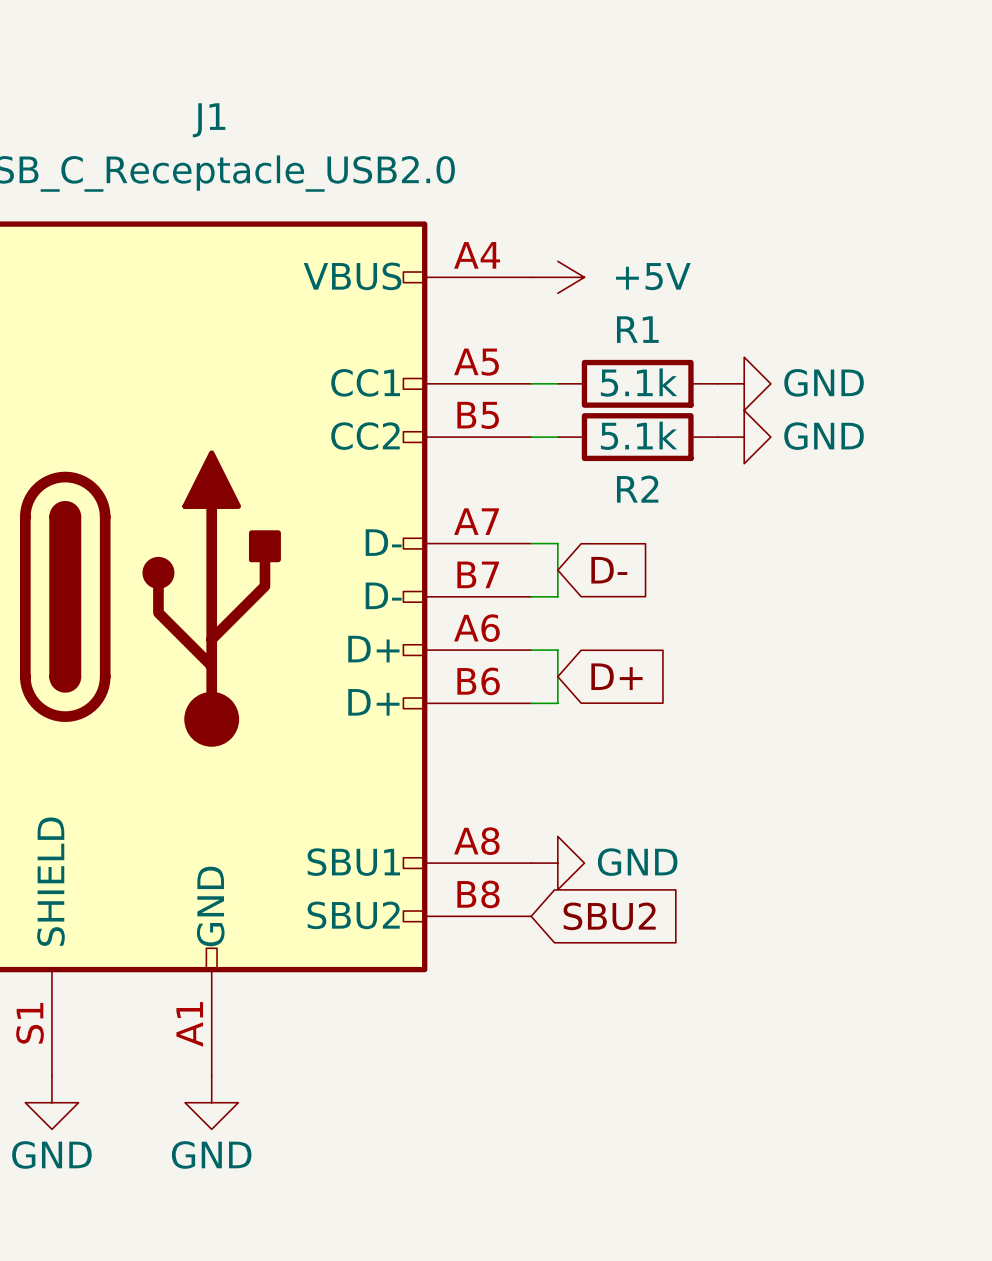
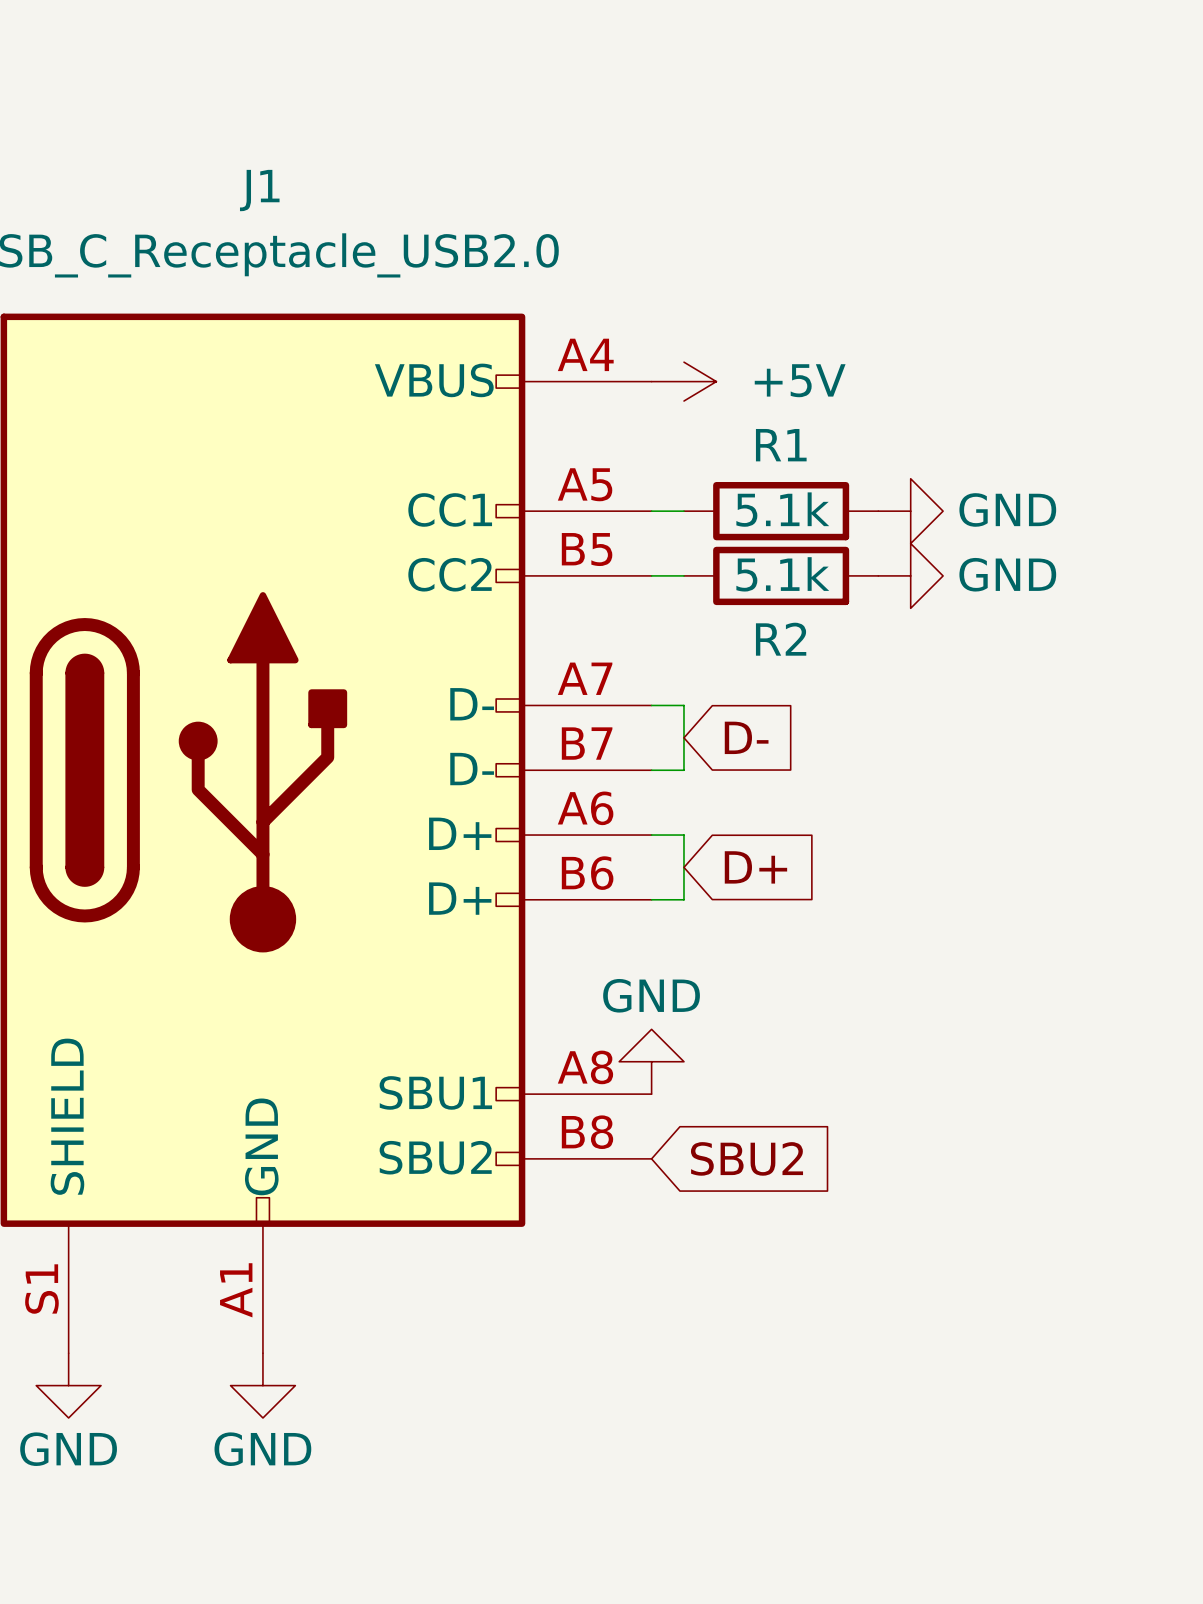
power symbol rotation: 0° (557, 863) -> 90° counterclockwise (651, 1061)
power symbol position: GND (557, 863) -> GND (651, 1061)

